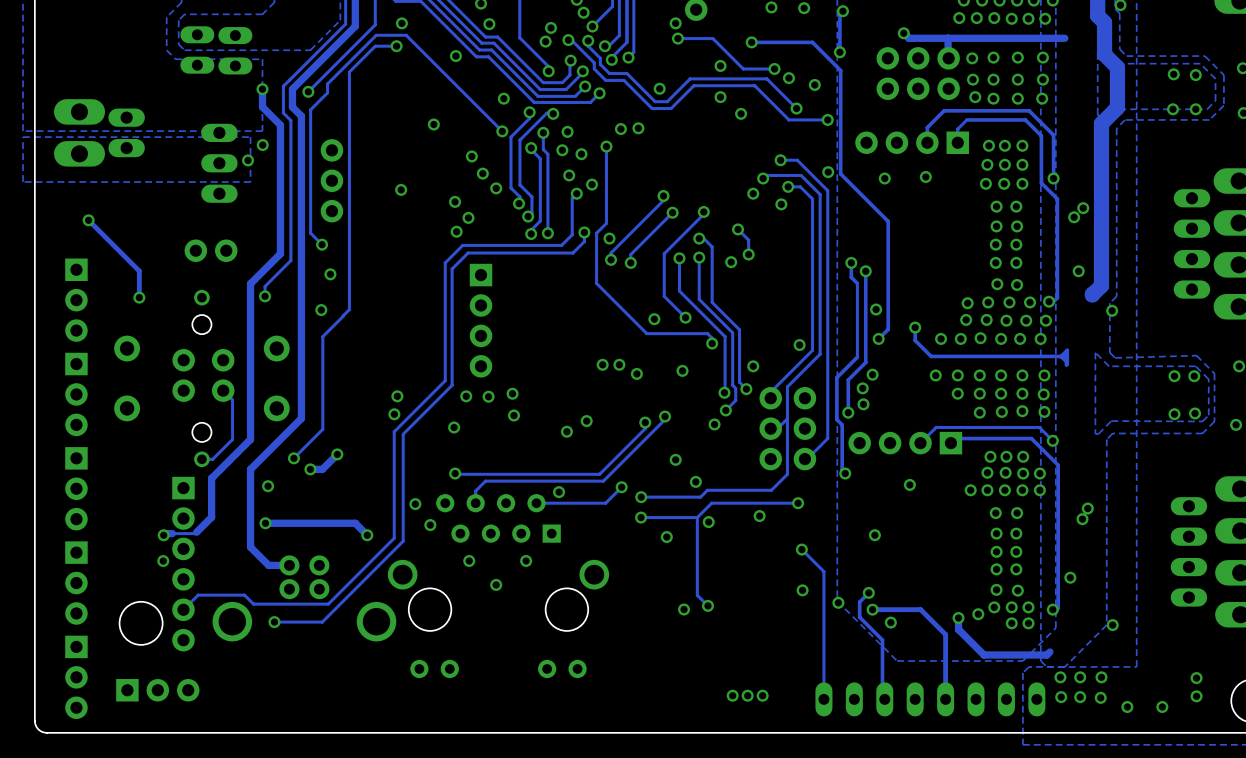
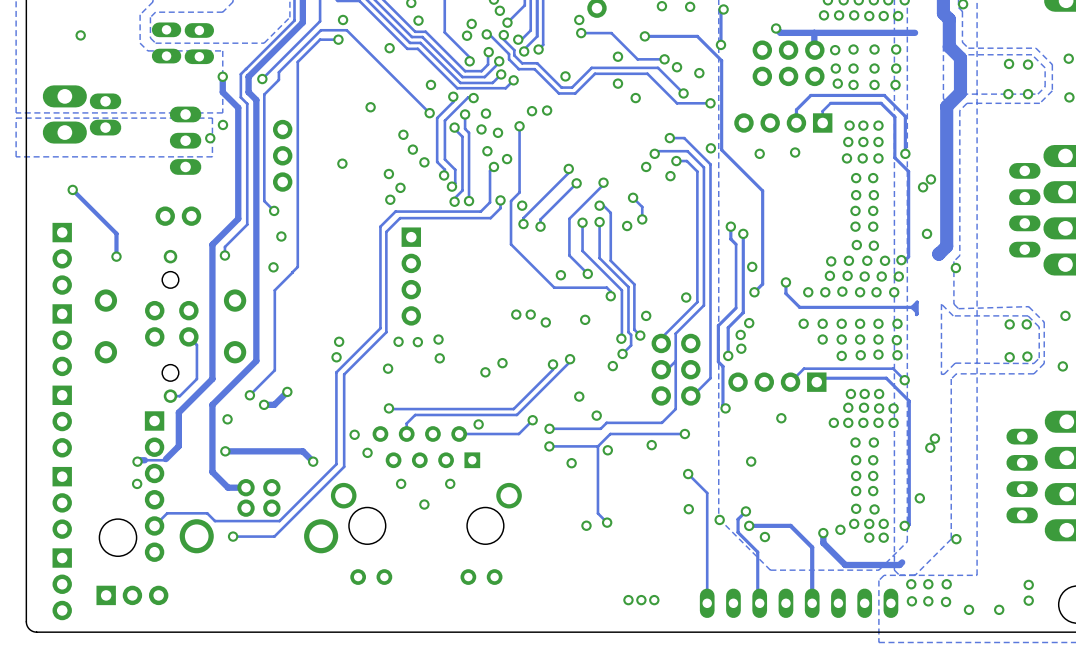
via: none -> (80, 35)

